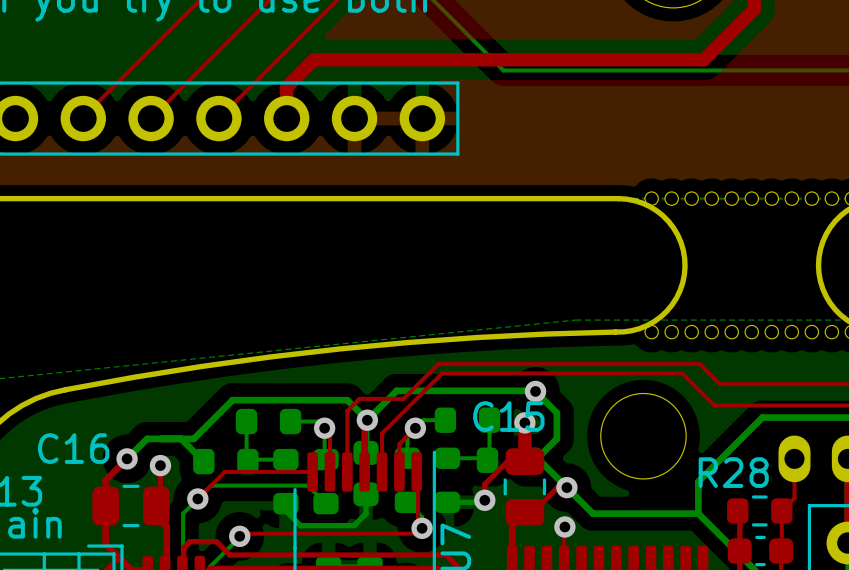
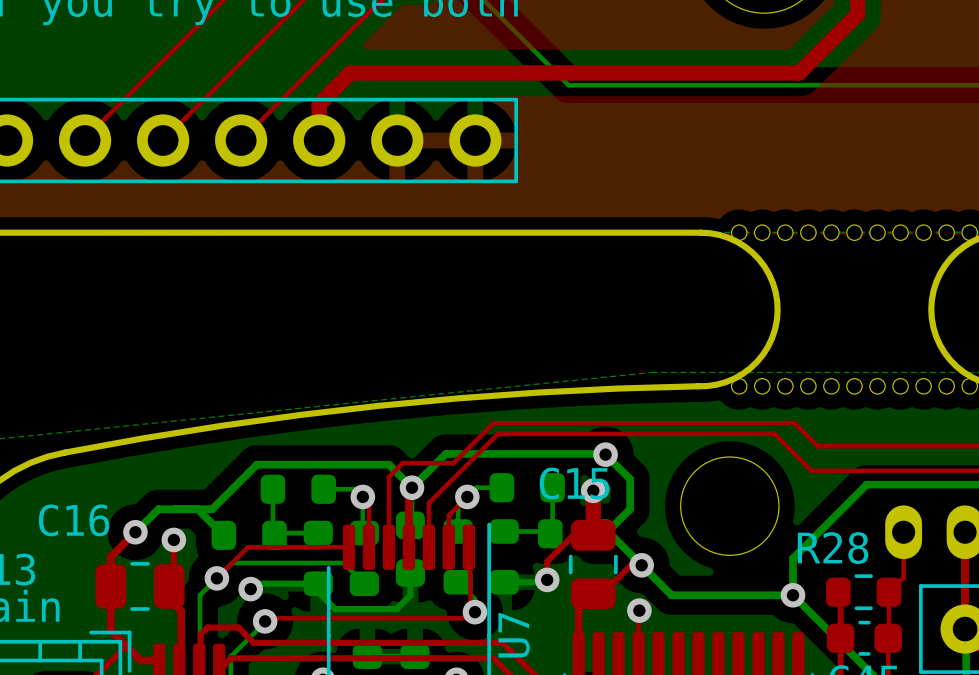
bottom track: none -> (318, 583) (256, 583) (250, 589)
via: none -> (250, 589)
via: none -> (793, 595)

